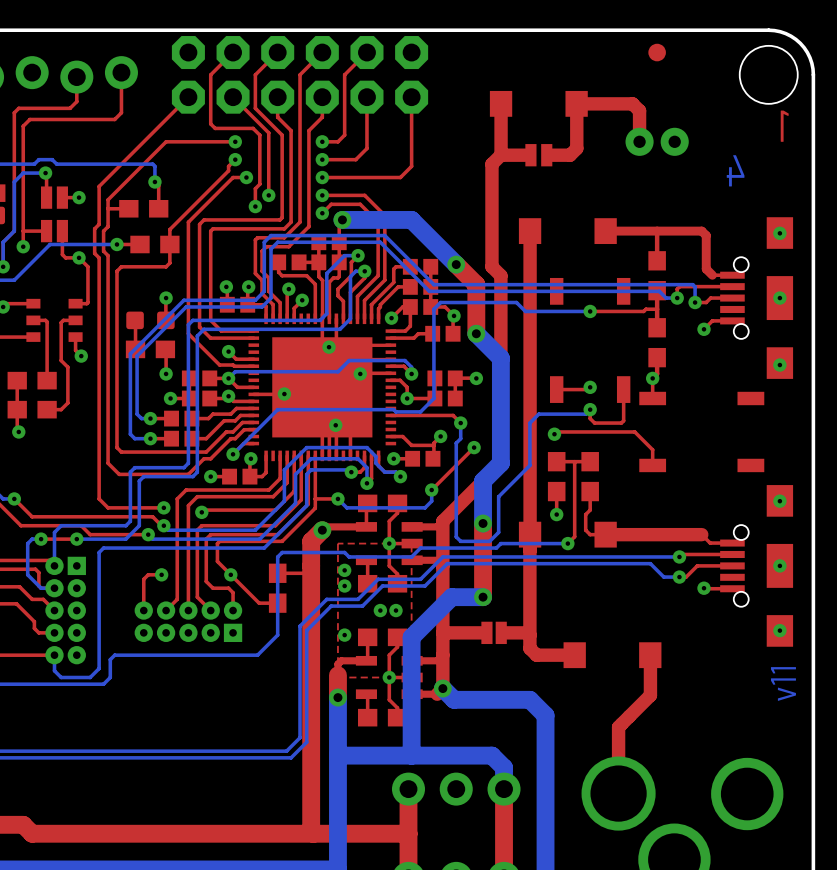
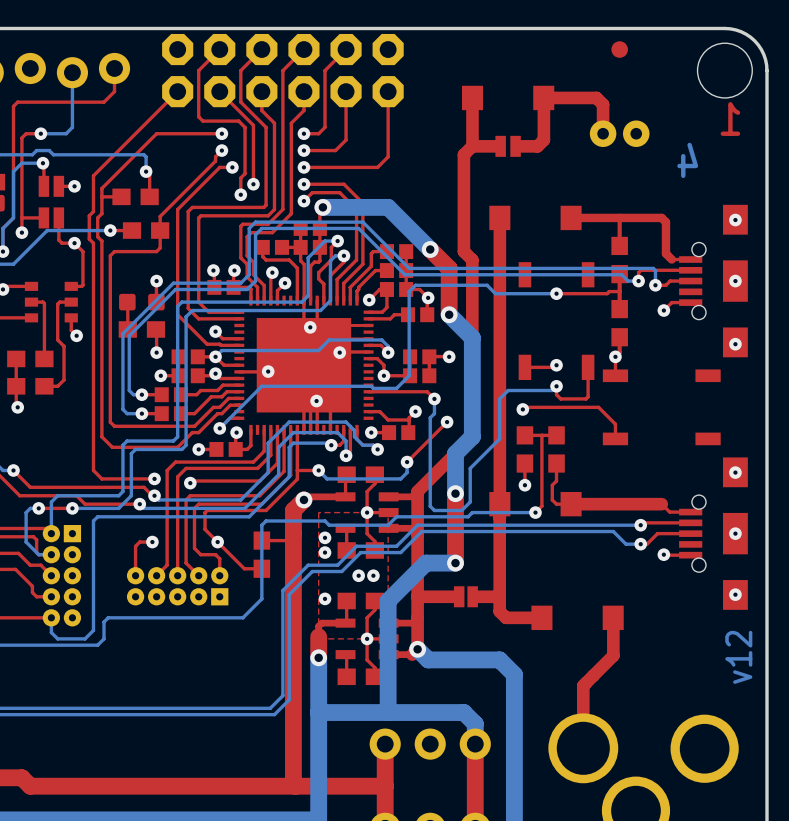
top track: (76, 77) (76, 101) (70, 108) -> (114, 91) (104, 102) (66, 102)
bottom track: none -> (72, 72) (72, 127) (66, 133) (40, 133)
top track: (121, 97) (121, 112) (114, 119) (29, 119) (23, 126) (23, 146) -> (40, 133) (26, 133) (21, 137)
via: none -> (40, 133)
text: v11 (783, 683) -> v12 (738, 657)

